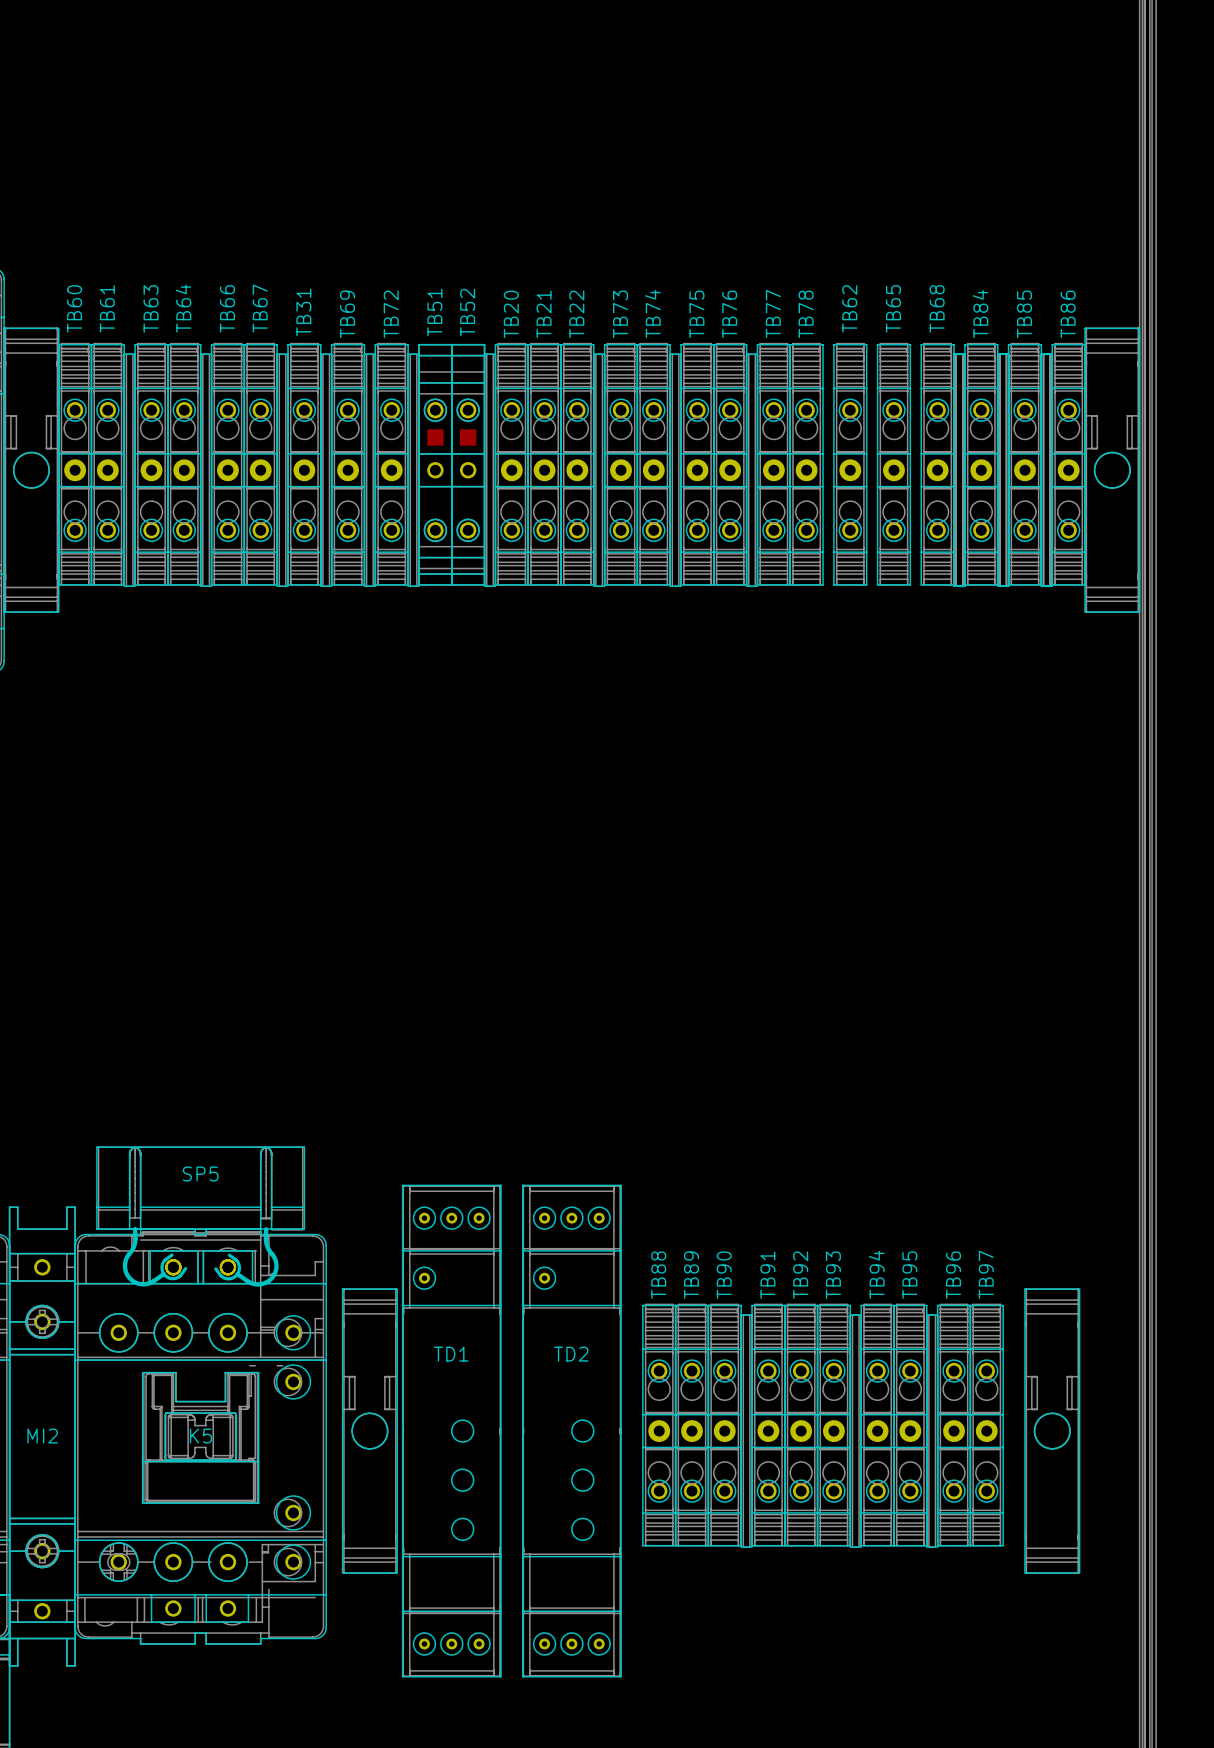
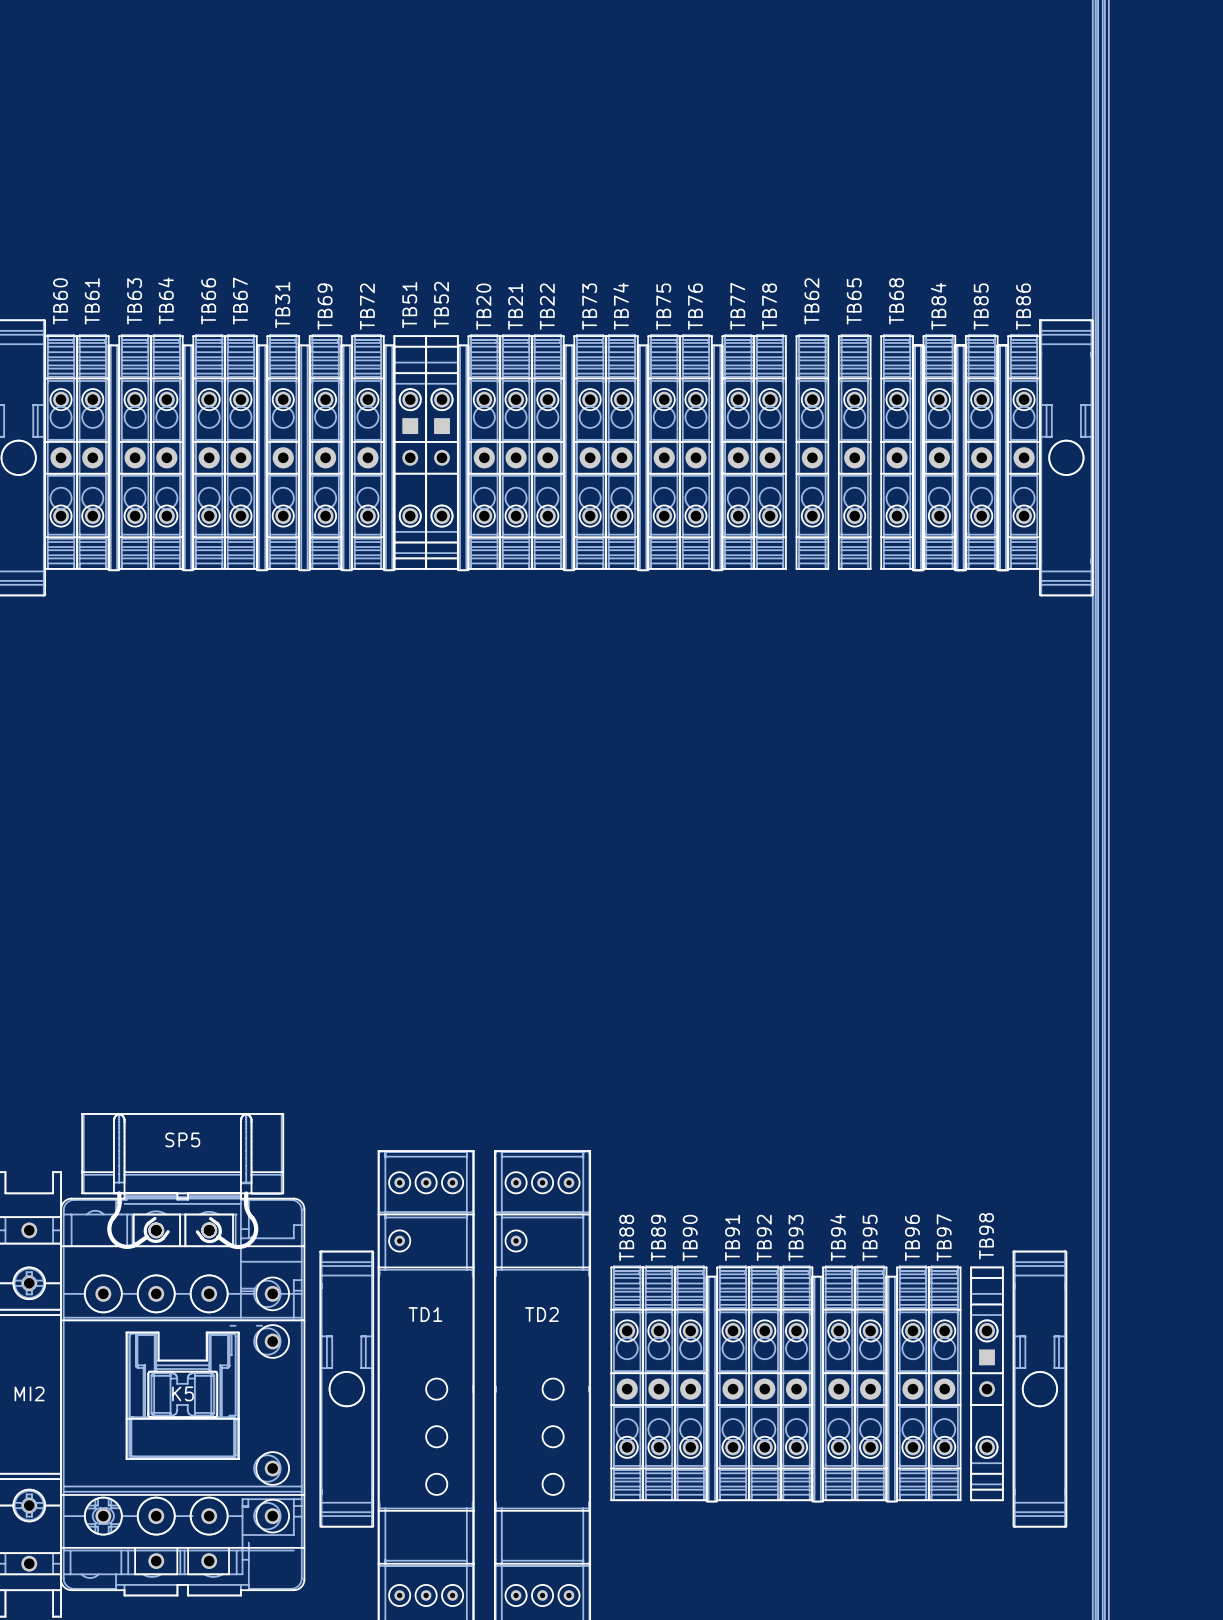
TB98: none -> (987, 1383)
drawing position: (1052, 1431) -> (1039, 1389)

